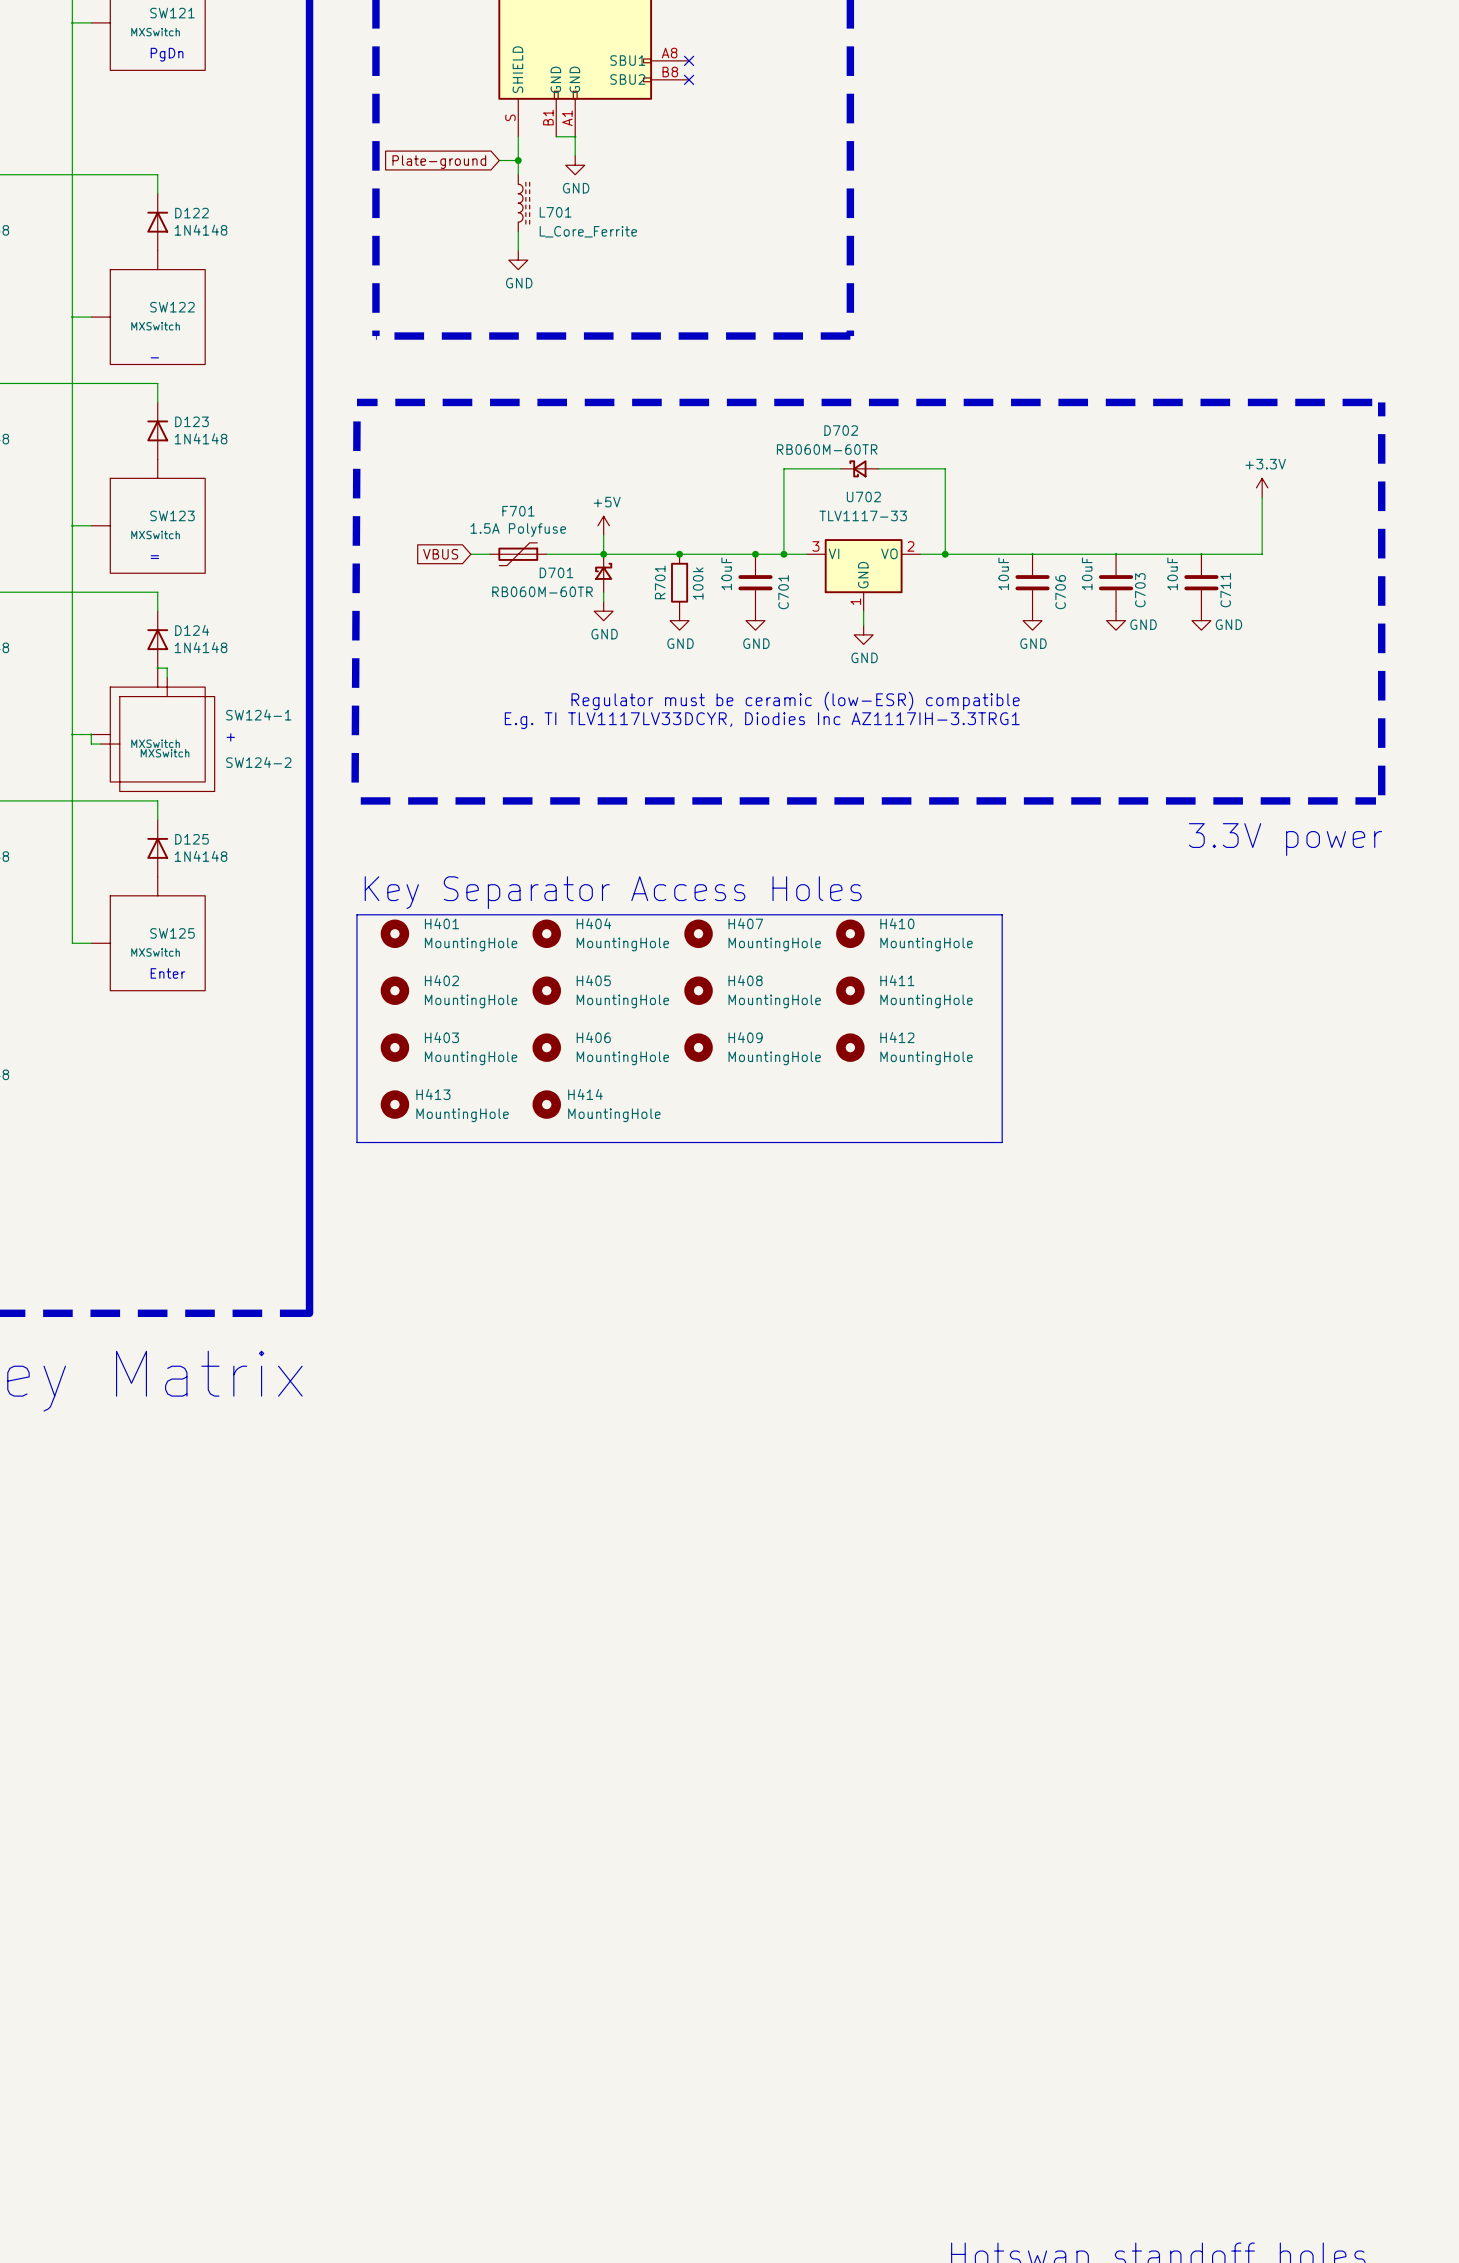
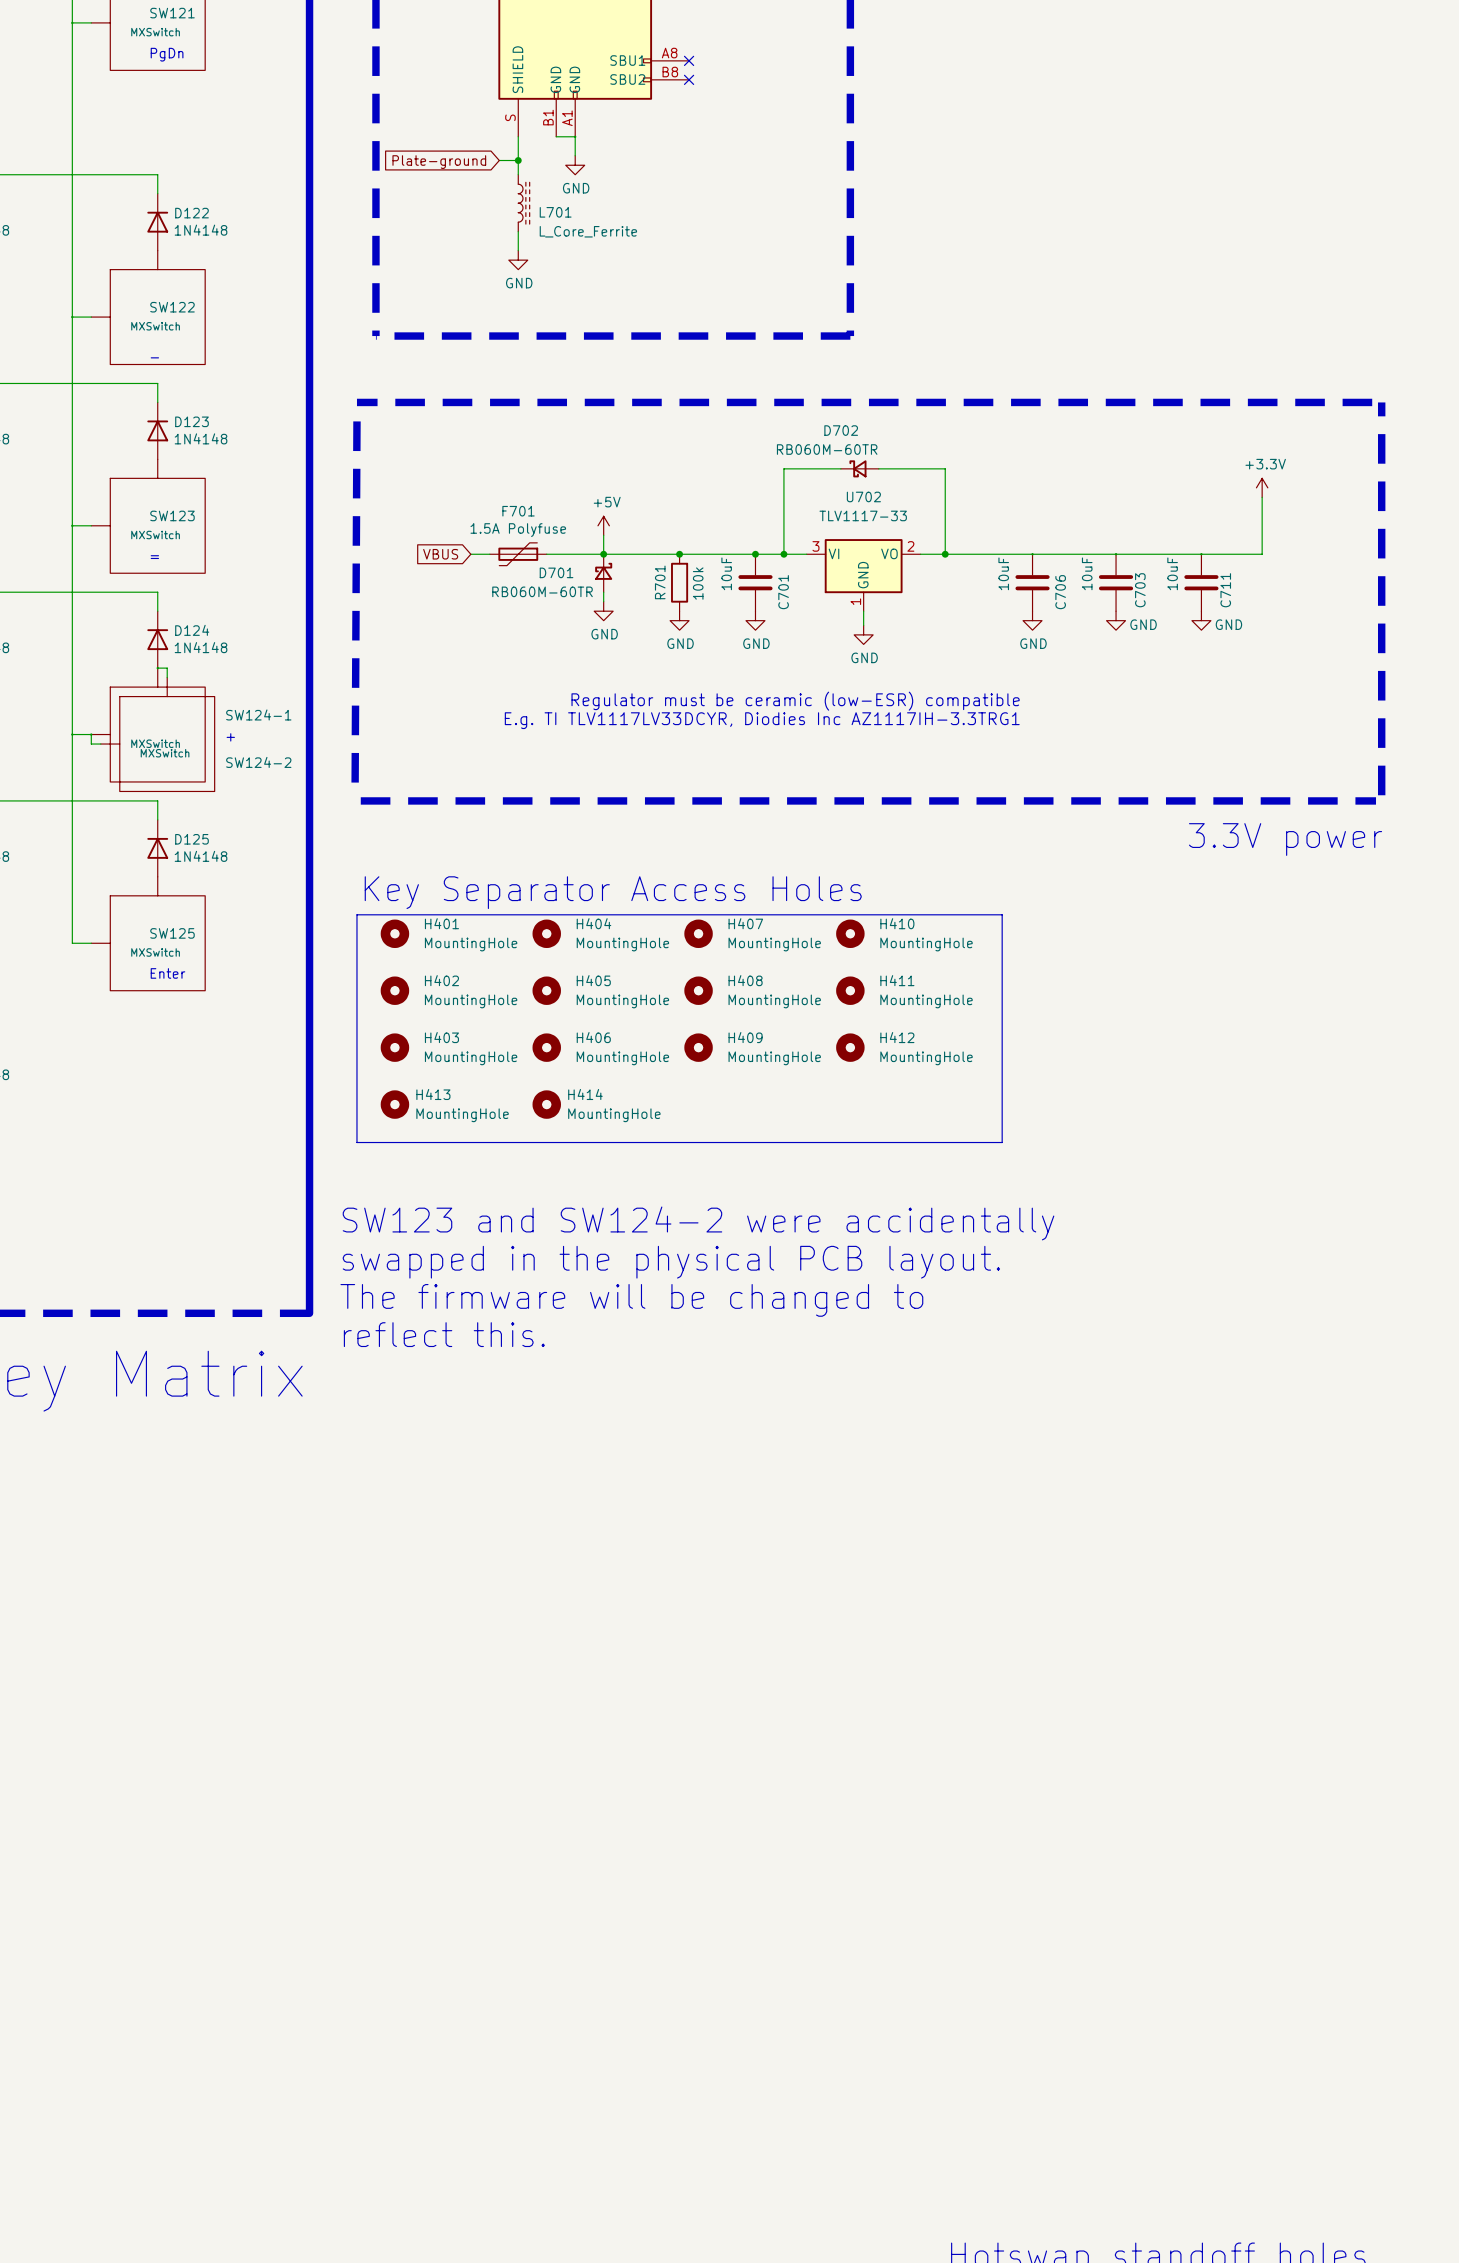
text: none -> SW123 and SW124-2 were accidentally (698, 1223)
text: none -> swapped in the physical PCB layout. (671, 1262)
text: none -> The firmware will be changed to (631, 1300)
text: none -> reflect this. (444, 1334)

